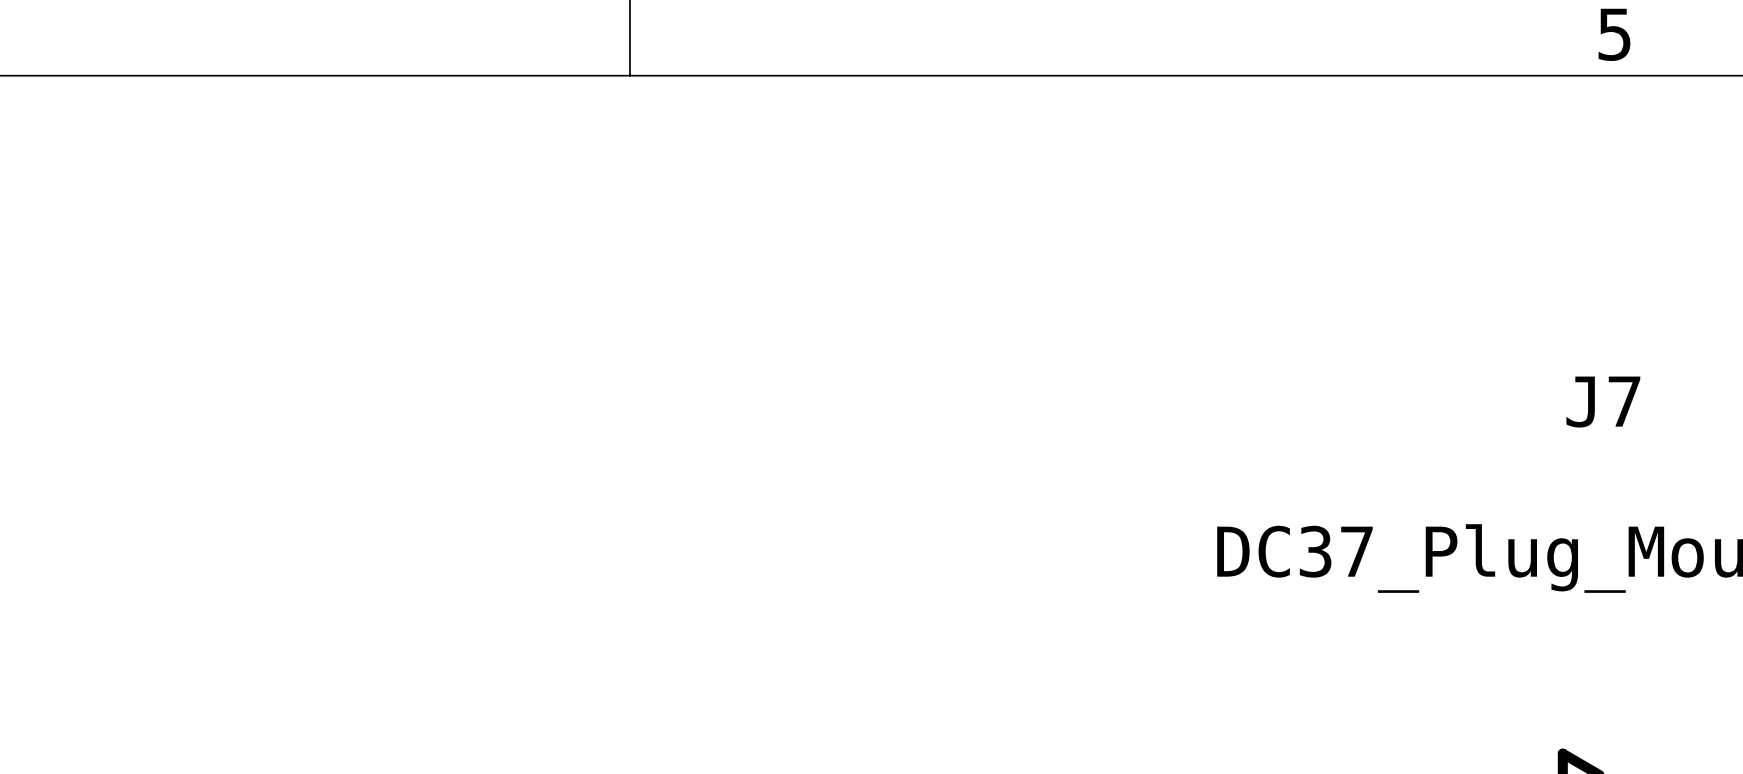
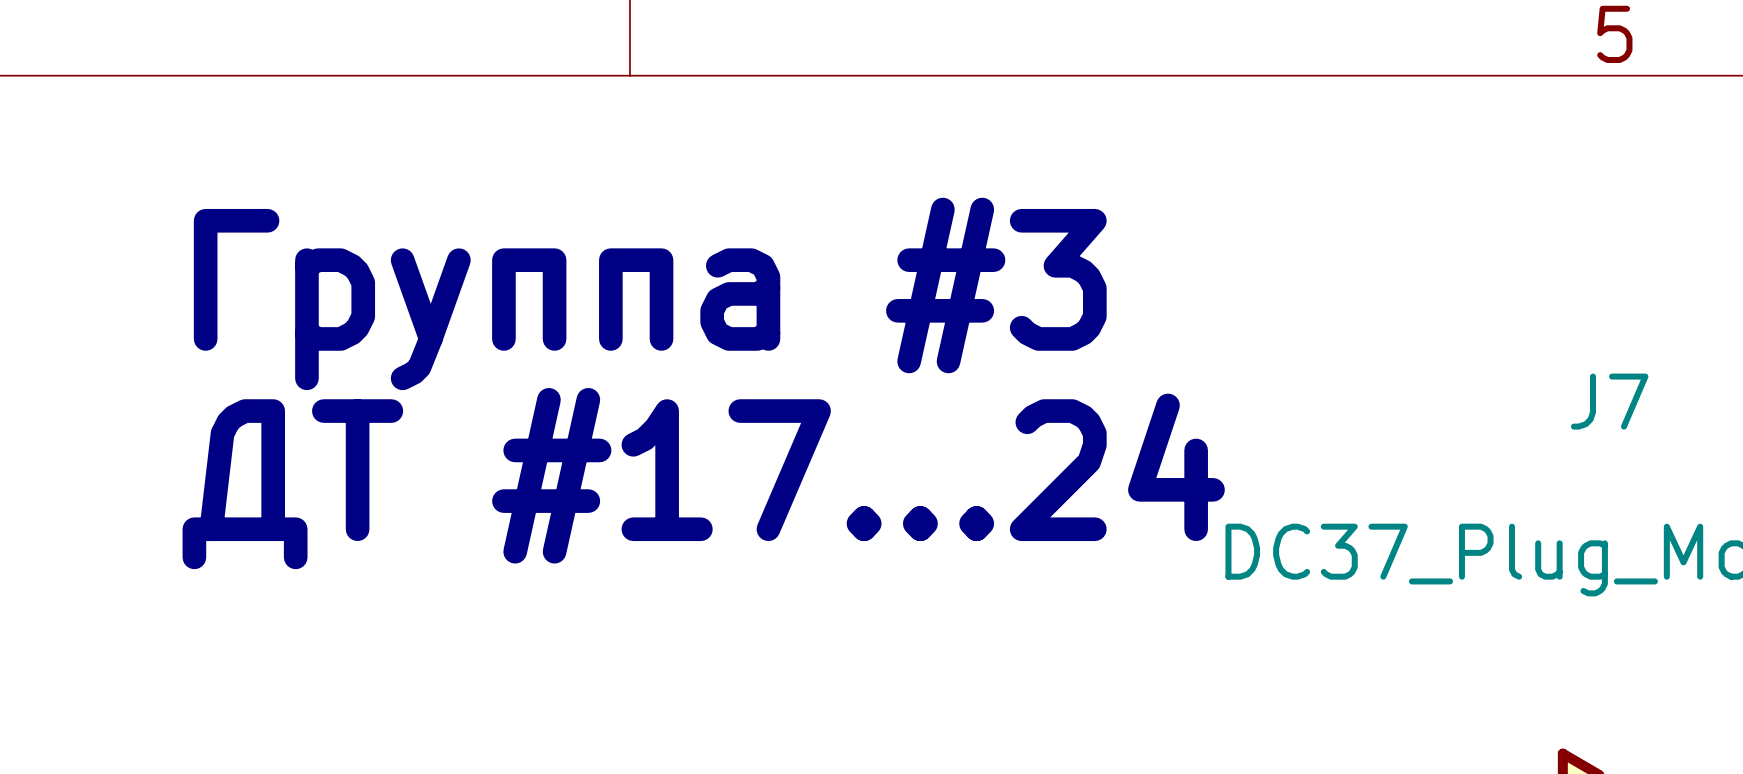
text: none -> Группа #3 (650, 293)
text: none -> ДТ #17...24 (703, 478)

